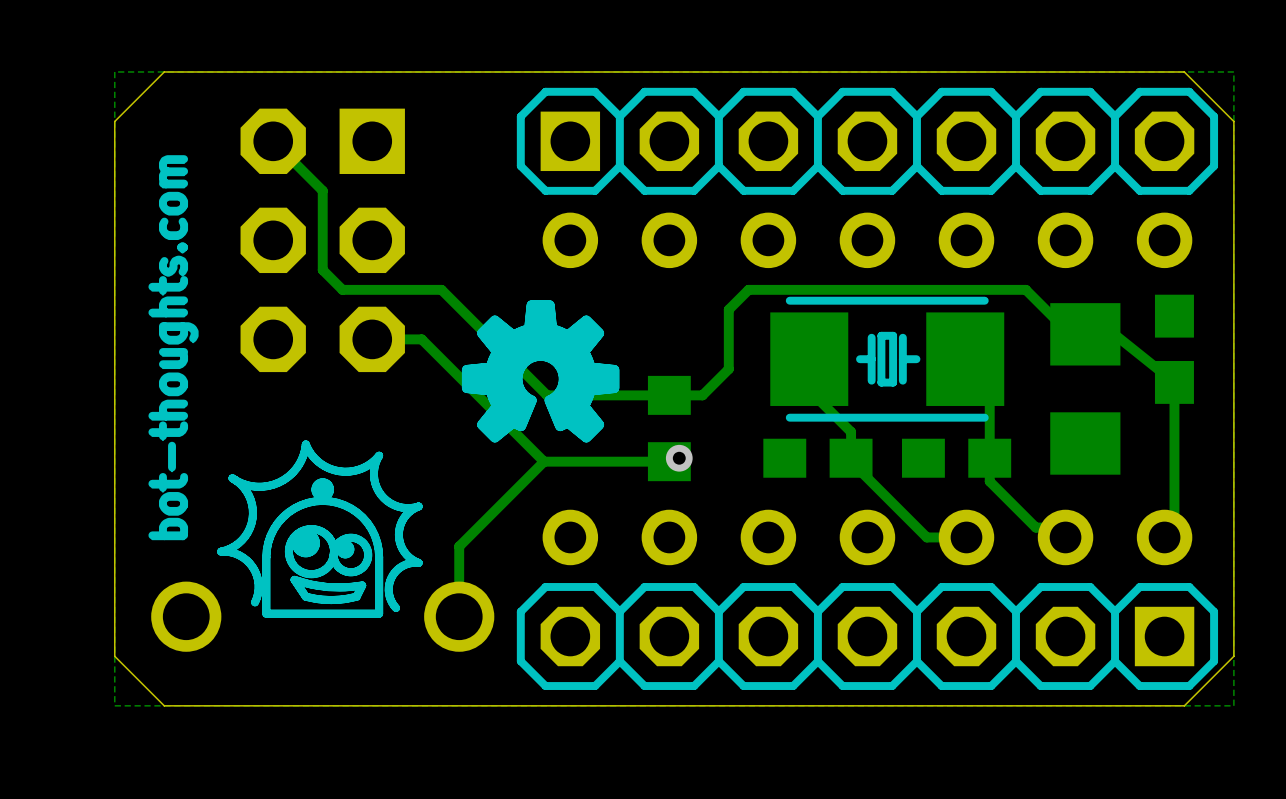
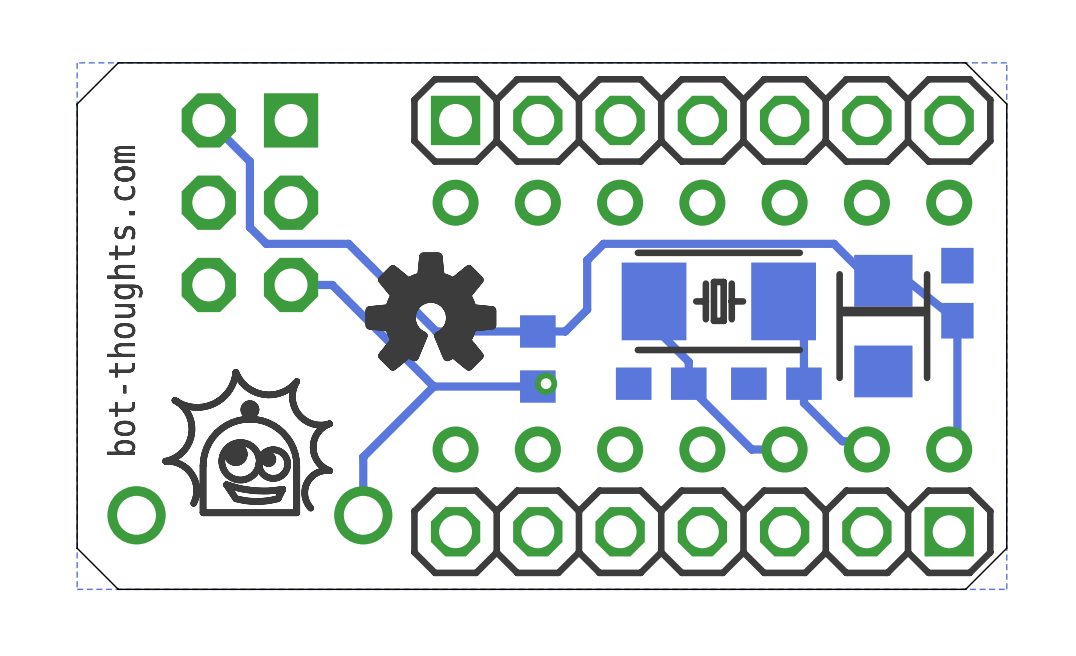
line: none -> (839, 274) (839, 377)
line: none -> (927, 274) (927, 377)
drawing: none -> [841, 306, 926, 317]

